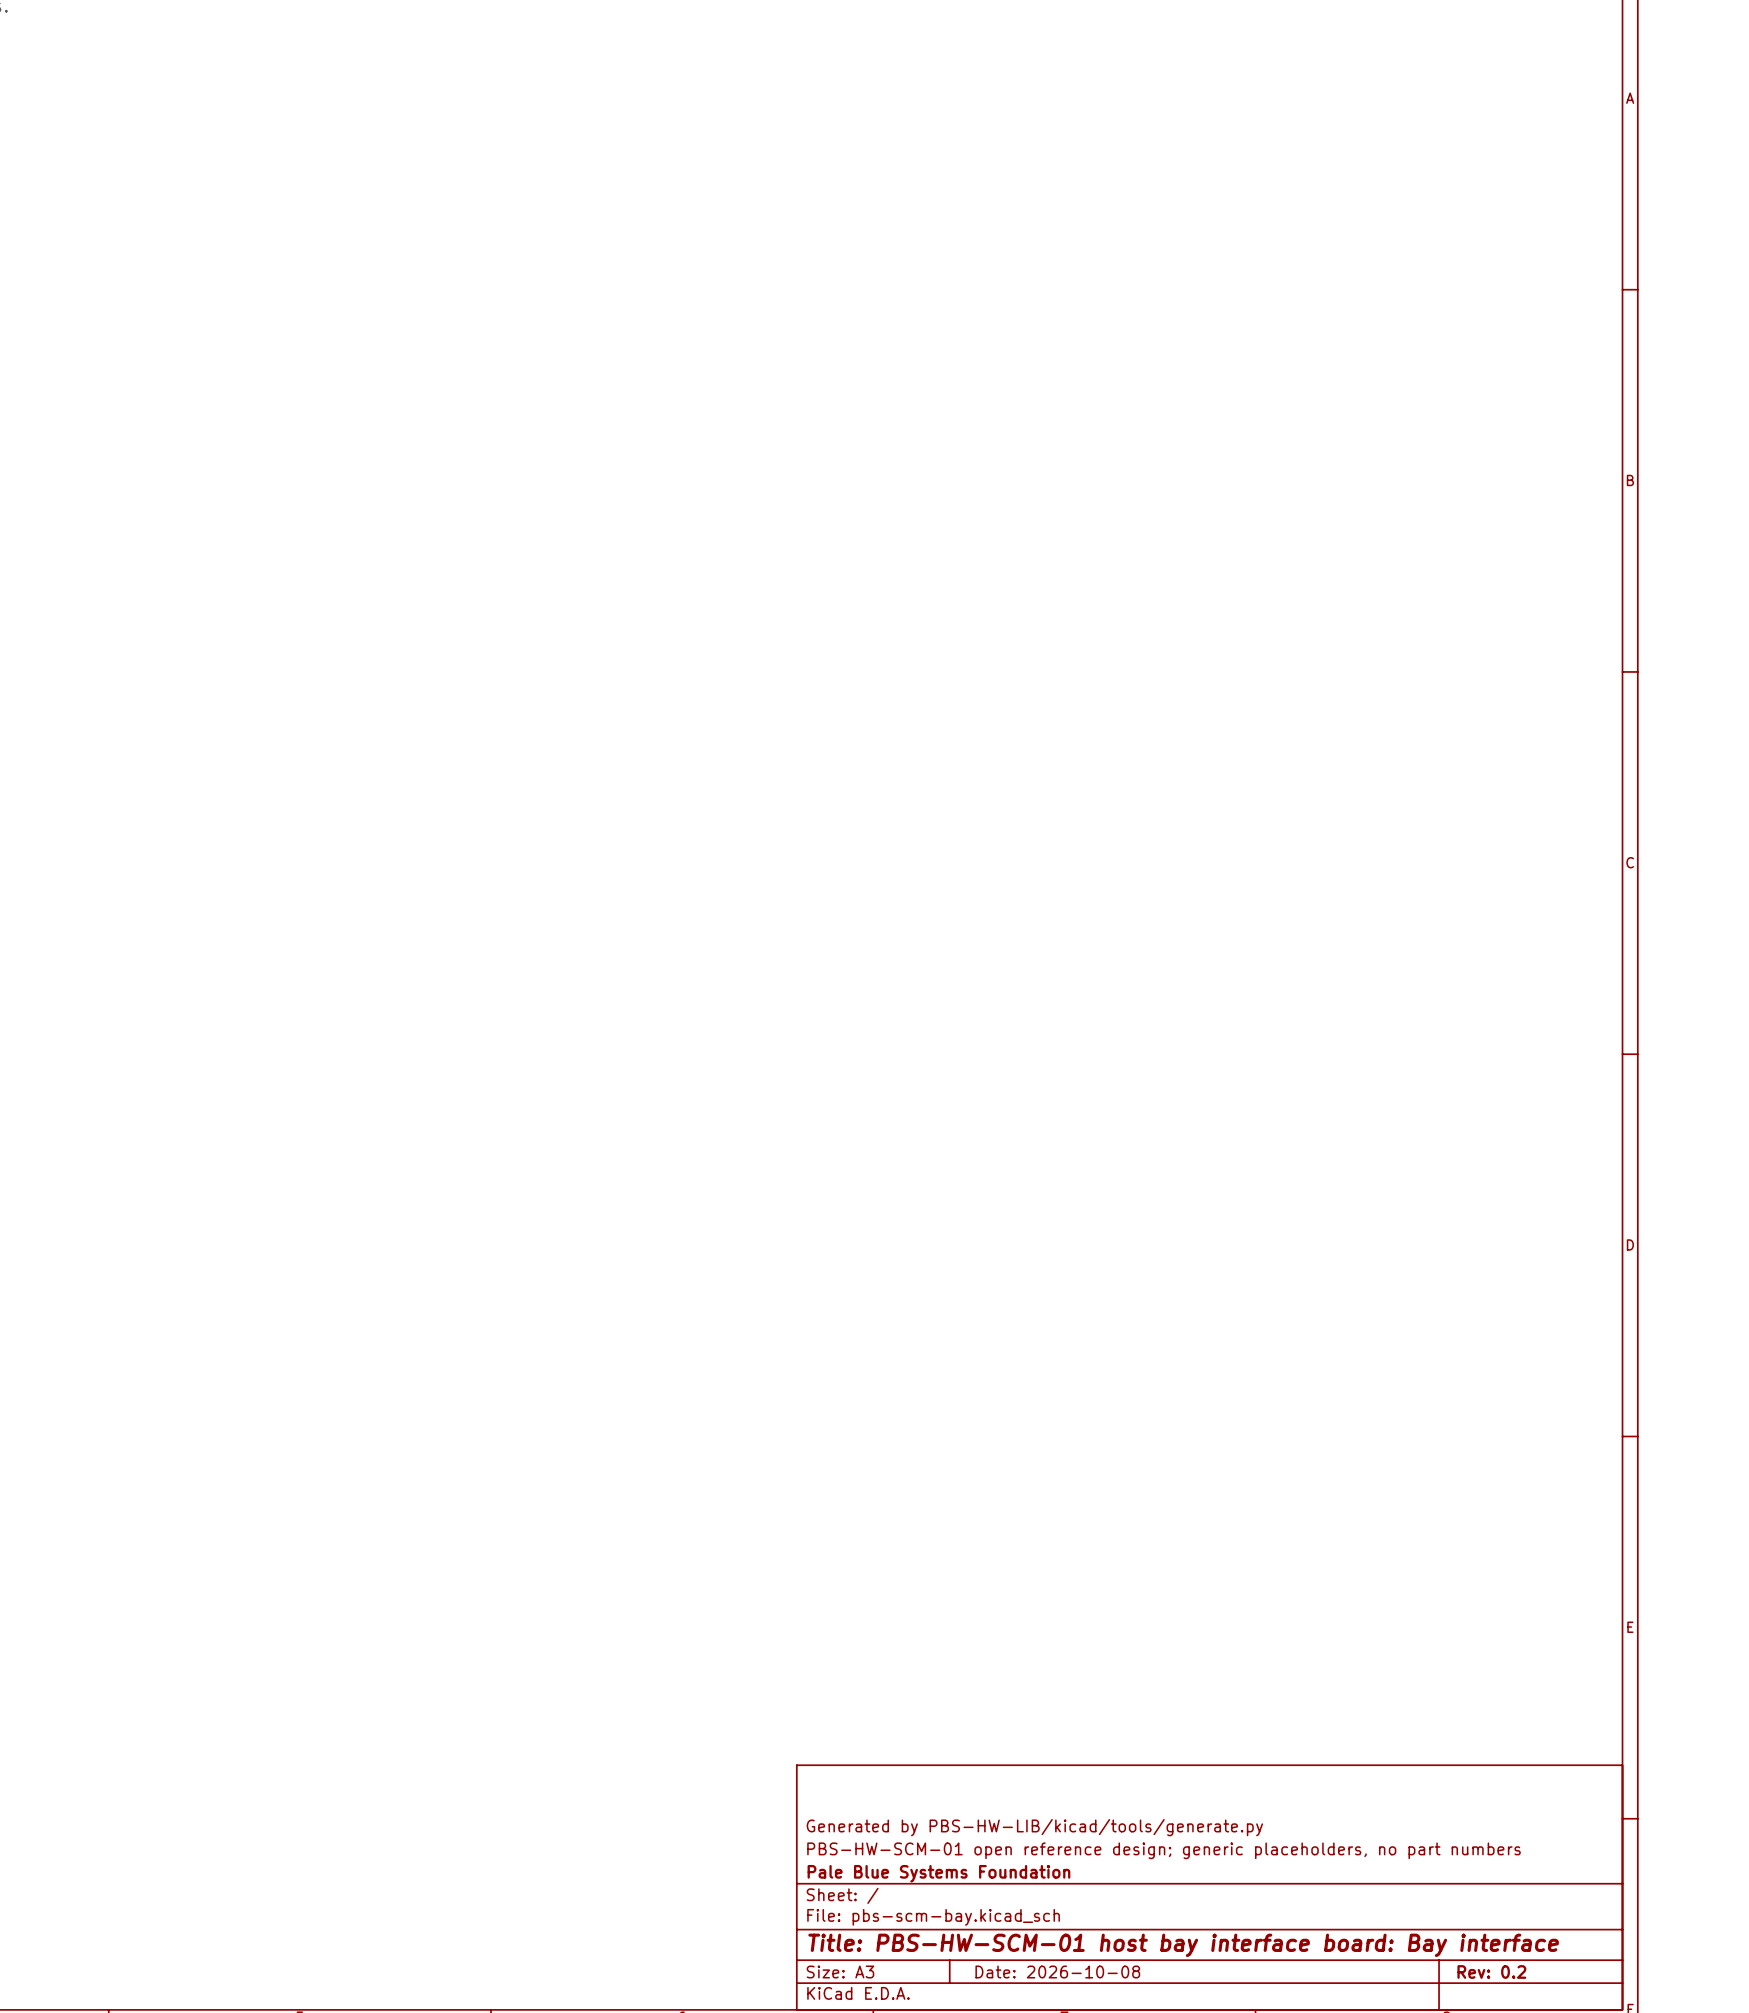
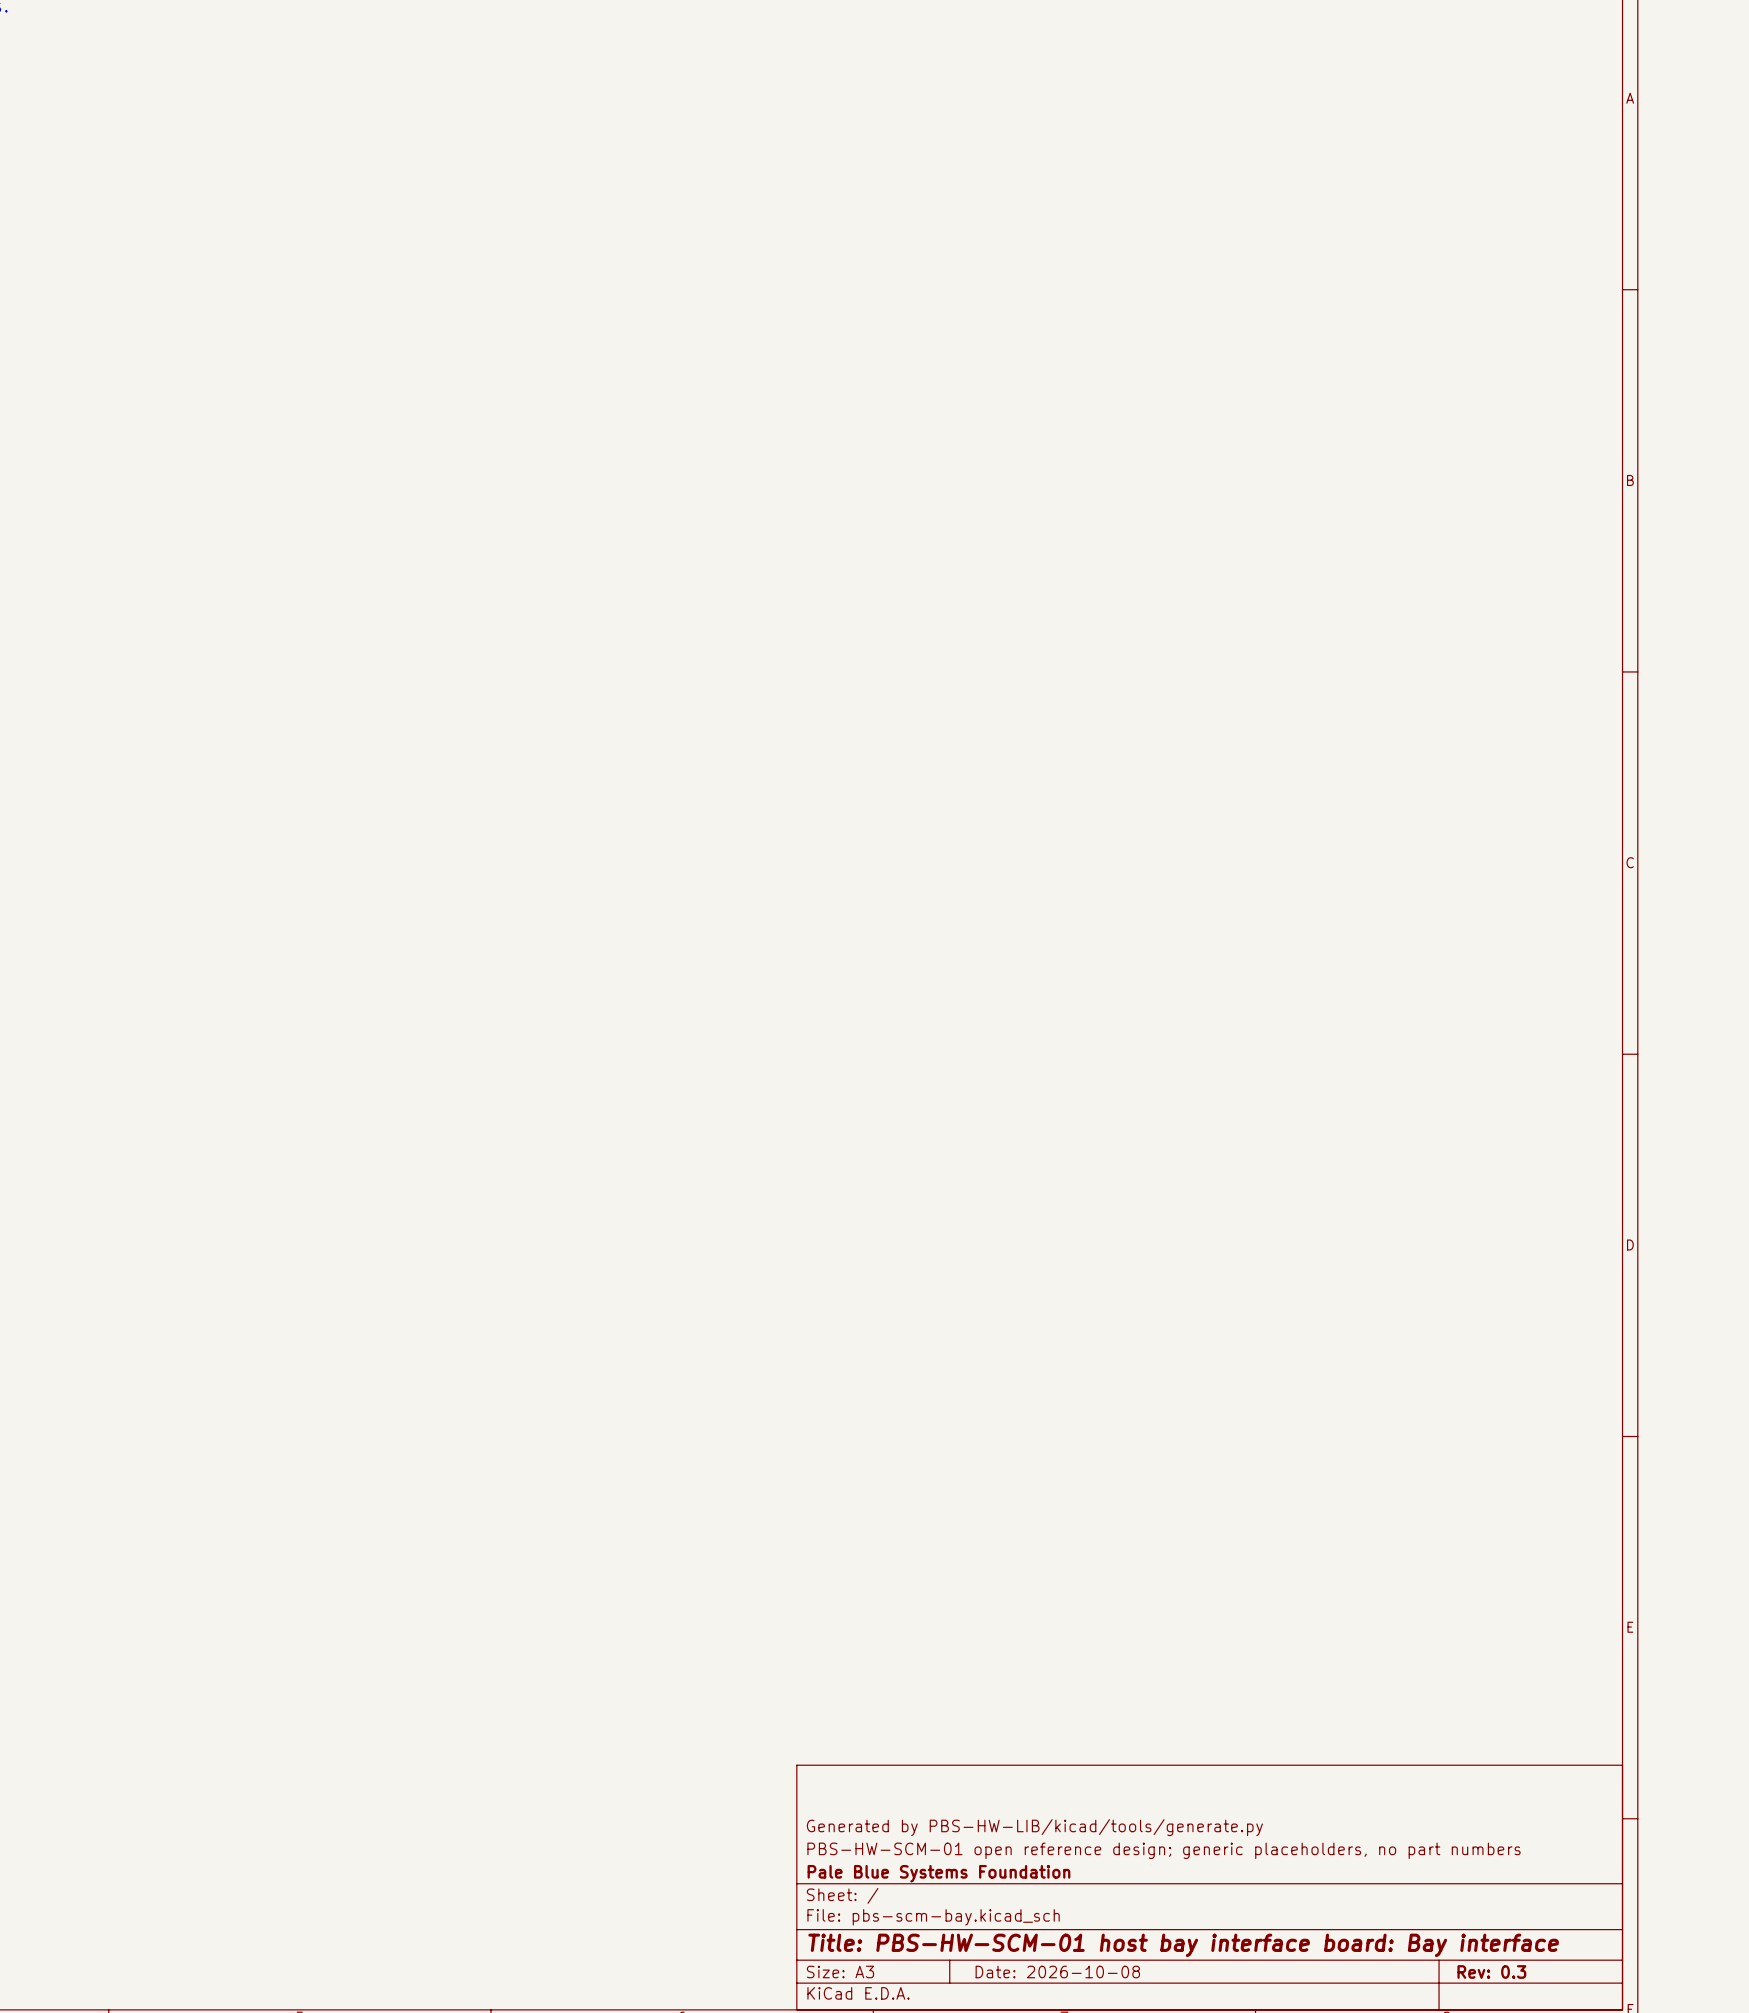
title block: Rev: 0.2 (1491, 1971) -> Rev: 0.3 (1491, 1971)

